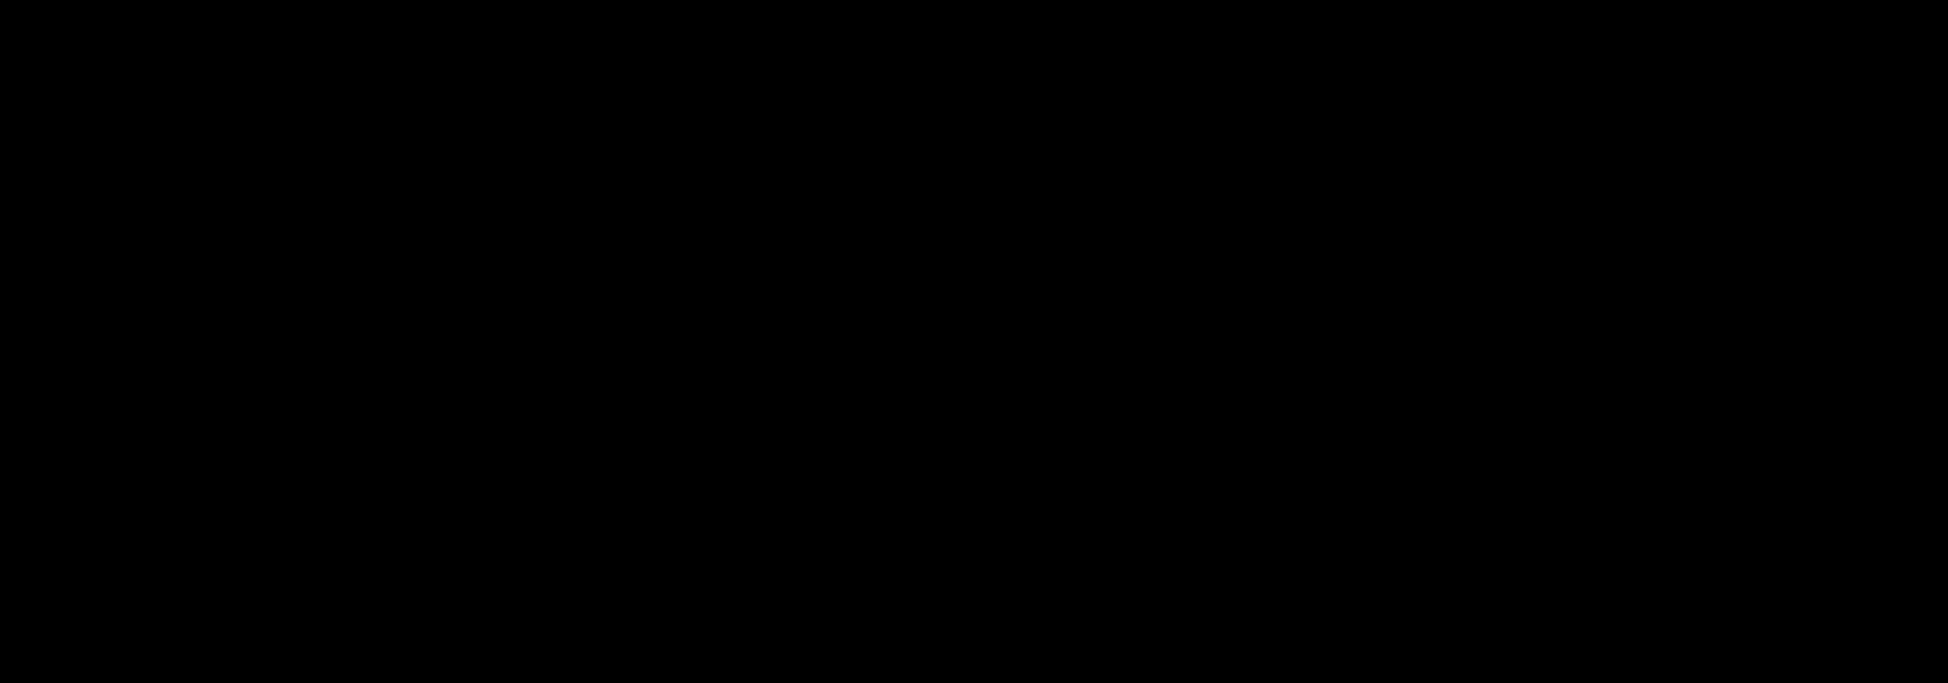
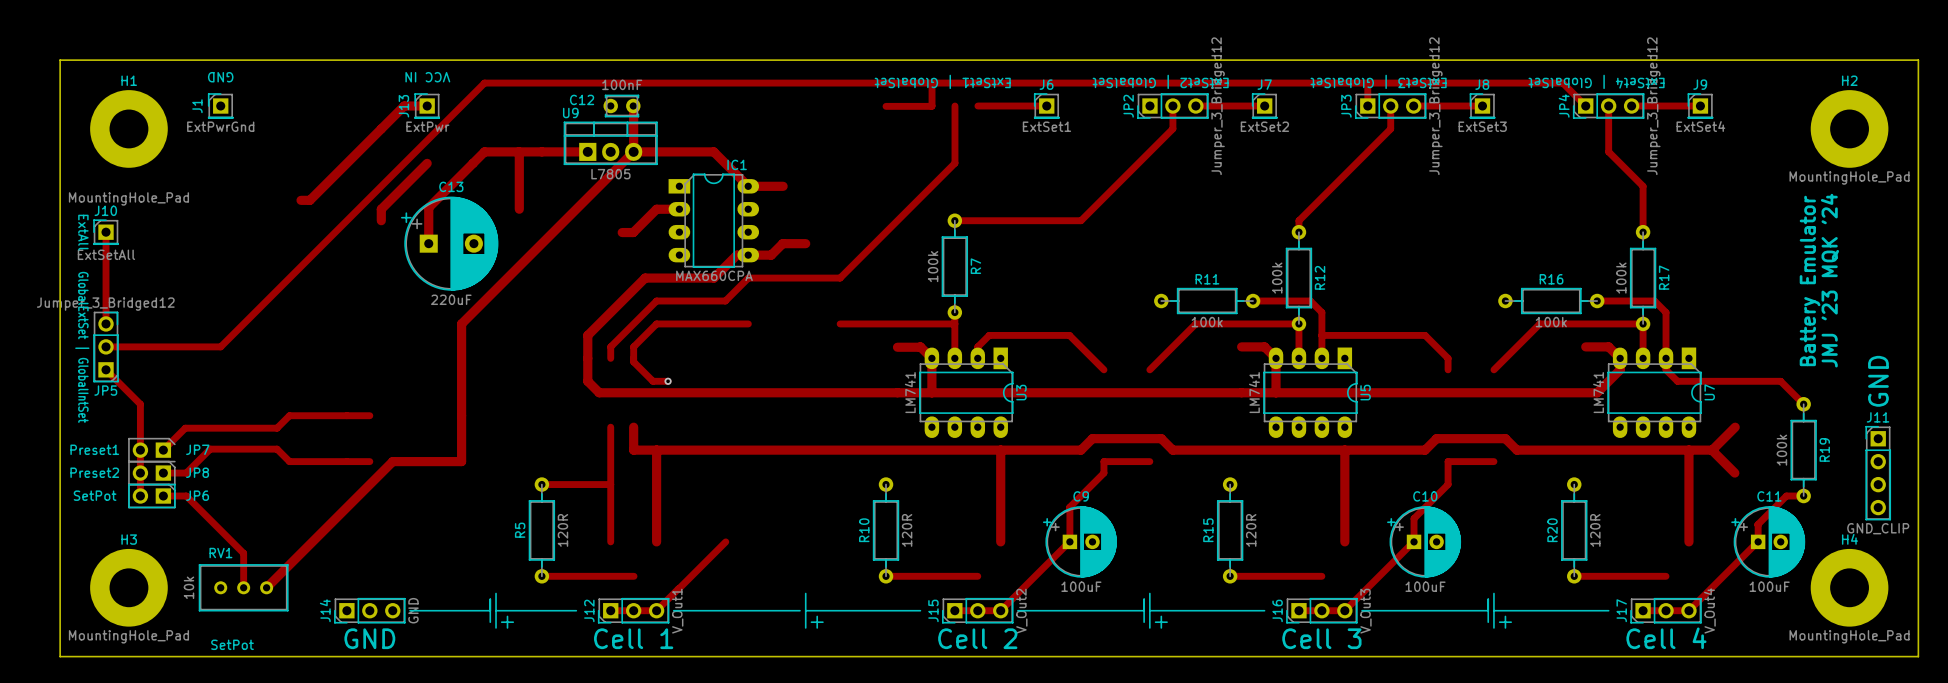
board edge: none -> (60, 60) (1918, 60) (1918, 656) (60, 656) (60, 60)
text: none -> GND (220, 77)
text: none -> VCC IN (427, 77)
text: none -> ExtSet1 | GlobalSet (942, 81)
text: none -> ExtSet2 | GlobalSet (1160, 81)
text: none -> ExtSet3 | GlobalSet (1378, 81)
text: none -> ExtSet4 | GlobalSet (1596, 81)
track: none -> (931, 83) (931, 106) (886, 106)
track: none -> (1367, 83) (1367, 106)
J1: none -> ExtPwrGnd (220, 106)
track: none -> (427, 106) (404, 106) (309, 200) (301, 200)
J13: none -> ExtPwr (427, 106)
C12: none -> 100nF (622, 106)
track: none -> (633, 106) (633, 151)
track: none -> (954, 106) (954, 163) (840, 278) (748, 278) (725, 301) (656, 301) (610, 346) (610, 358)
track: none -> (977, 106) (1046, 106)
J6: none -> ExtSet1 (1046, 106)
track: none -> (1172, 106) (1172, 128) (1081, 220) (954, 220)
JP2: none -> Jumper_3_Bridged12 (1172, 106)
track: none -> (1195, 106) (1264, 106)
J7: none -> ExtSet2 (1264, 106)
track: none -> (1390, 106) (1390, 128) (1298, 220) (1298, 232)
JP3: none -> Jumper_3_Bridged12 (1390, 106)
track: none -> (1413, 106) (1482, 106)
J8: none -> ExtSet3 (1482, 106)
track: none -> (1585, 106) (1562, 83) (484, 83) (220, 346) (106, 346)
track: none -> (1608, 106) (1608, 151) (1643, 186) (1643, 232)
JP4: none -> Jumper_3_Bridged12 (1608, 106)
track: none -> (1631, 106) (1700, 106)
J9: none -> ExtSet4 (1700, 106)
H1: none -> MountingHole_Pad (128, 128)
H2: none -> MountingHole_Pad (1849, 128)
U9: none -> L7805 (610, 143)
track: none -> (518, 151) (519, 209)
track: none -> (587, 151) (484, 151) (428, 207) (428, 243)
track: none -> (633, 151) (713, 151) (748, 186) (783, 186)
track: none -> (633, 151) (461, 323) (461, 461) (392, 461) (266, 587)
track: none -> (427, 163) (381, 209) (381, 220)
track: none -> (679, 209) (656, 209) (633, 232) (622, 232)
IC1: none -> MAX660CPA (713, 220)
text: none -> ExtAll (83, 232)
track: none -> (106, 232) (106, 323)
J10: none -> ExtSetAll (106, 232)
C13: none -> 220uF (449, 243)
track: none -> (805, 243) (782, 243) (771, 255) (736, 255) (713, 278) (645, 278) (587, 335) (587, 381) (599, 392) (1597, 392) (1620, 369) (1620, 358) (1608, 346) (1585, 346)
R7: none -> 100k (954, 266)
R12: none -> 100k (1298, 278)
R17: none -> 100k (1643, 278)
text: none -> Battery Emulator (1810, 280)
text: none -> JMJ '23 MQK '24 (1829, 280)
R11: none -> 100k (1207, 301)
track: none -> (1253, 301) (1310, 301) (1321, 312) (1321, 358)
R16: none -> 100k (1551, 301)
track: none -> (1597, 301) (1654, 301) (1666, 312) (1666, 369) (1677, 381) (1780, 381) (1803, 404)
track: none -> (954, 312) (954, 358)
track: none -> (748, 323) (656, 323) (633, 346) (633, 361) (652, 381) (668, 381)
track: none -> (840, 323) (954, 323)
track: none -> (1321, 335) (1425, 335) (1448, 358) (1448, 369)
track: none -> (1241, 346) (1264, 346) (1276, 358) (1276, 392)
text: none -> GlobalExtSet | GlobalIntSet (82, 347)
JP5: none -> Jumper_3_Bridged12 (106, 347)
track: none -> (897, 347) (920, 346) (931, 358) (931, 392)
track: none -> (977, 358) (977, 346) (989, 335) (1069, 335) (1103, 369)
track: none -> (1298, 358) (1298, 323) (1195, 323) (1149, 369)
track: none -> (1643, 358) (1643, 323) (1539, 323) (1493, 369)
track: none -> (106, 369) (140, 404) (140, 496)
via: none -> (668, 381)
text: none -> GND (1878, 381)
U3: none -> LM741 (966, 392)
U5: none -> LM741 (1310, 392)
U7: none -> LM741 (1654, 392)
track: none -> (369, 415) (289, 415) (277, 428) (185, 428) (163, 450)
track: none -> (610, 427) (610, 541)
track: none -> (633, 427) (633, 450) (1081, 450) (1092, 438) (1161, 438) (1172, 450) (1425, 450) (1436, 438) (1505, 438) (1516, 450) (1712, 450)
track: none -> (1735, 427) (1712, 450)
JP7: none -> Preset1 (151, 450)
track: none -> (656, 450) (656, 541)
track: none -> (1000, 450) (1000, 541)
track: none -> (1344, 450) (1344, 541)
track: none -> (1688, 450) (1688, 541)
track: none -> (1712, 450) (1734, 473)
R19: none -> 100k (1803, 450)
track: none -> (369, 461) (289, 461) (277, 449) (210, 449) (186, 473) (163, 473)
track: none -> (1149, 461) (1103, 461) (1103, 473) (1069, 507) (1069, 541) (1000, 610) (954, 610)
track: none -> (1493, 461) (1448, 461) (1448, 484) (1414, 518) (1414, 541) (1344, 610) (1298, 610)
JP8: none -> Preset2 (151, 473)
J11: none -> GND_CLIP (1878, 473)
track: none -> (541, 484) (610, 484)
JP6: none -> SetPot (151, 496)
track: none -> (163, 496) (186, 496) (243, 553) (243, 587)
track: none -> (1803, 496) (1786, 496) (1757, 524) (1758, 541) (1688, 610) (1643, 610)
R5: none -> 120R (541, 530)
R10: none -> 120R (886, 530)
R15: none -> 120R (1230, 530)
R20: none -> 120R (1574, 530)
track: none -> (725, 541) (656, 610) (610, 610)
C9: none -> 100uF (1079, 541)
C10: none -> 100uF (1424, 541)
C11: none -> 100uF (1768, 541)
track: none -> (541, 576) (634, 576)
track: none -> (886, 576) (977, 576)
track: none -> (1230, 576) (1321, 576)
track: none -> (1574, 576) (1666, 576)
H3: none -> MountingHole_Pad (128, 587)
RV1: none -> 10k (243, 587)
H4: none -> MountingHole_Pad (1849, 587)
line: none -> (496, 593) (496, 627)
line: none -> (805, 593) (805, 627)
line: none -> (1149, 593) (1149, 627)
line: none -> (1493, 593) (1493, 627)
line: none -> (490, 599) (490, 622)
line: none -> (1144, 599) (1144, 622)
line: none -> (1488, 599) (1488, 622)
J14: none -> GND (369, 610)
line: none -> (409, 610) (490, 610)
line: none -> (496, 610) (576, 610)
J12: none -> V_Out1 (633, 610)
line: none -> (673, 610) (799, 610)
line: none -> (805, 610) (920, 610)
J15: none -> V_Out2 (977, 610)
line: none -> (1017, 610) (1144, 610)
line: none -> (1149, 610) (1264, 610)
J16: none -> V_Out3 (1321, 610)
line: none -> (1362, 610) (1488, 610)
line: none -> (1493, 610) (1608, 610)
J17: none -> V_Out4 (1666, 610)
line: none -> (507, 616) (507, 627)
line: none -> (817, 616) (817, 627)
line: none -> (1161, 616) (1161, 627)
line: none -> (1505, 616) (1505, 627)
line: none -> (501, 622) (513, 622)
line: none -> (811, 622) (822, 622)
line: none -> (1155, 622) (1167, 622)
line: none -> (1499, 622) (1511, 622)
text: none -> GND (369, 638)
text: none -> Cell 1 (633, 638)
text: none -> Cell 2 (977, 638)
text: none -> Cell 3 (1321, 638)
text: none -> Cell 4 (1666, 638)
text: none -> SetPot (232, 644)

